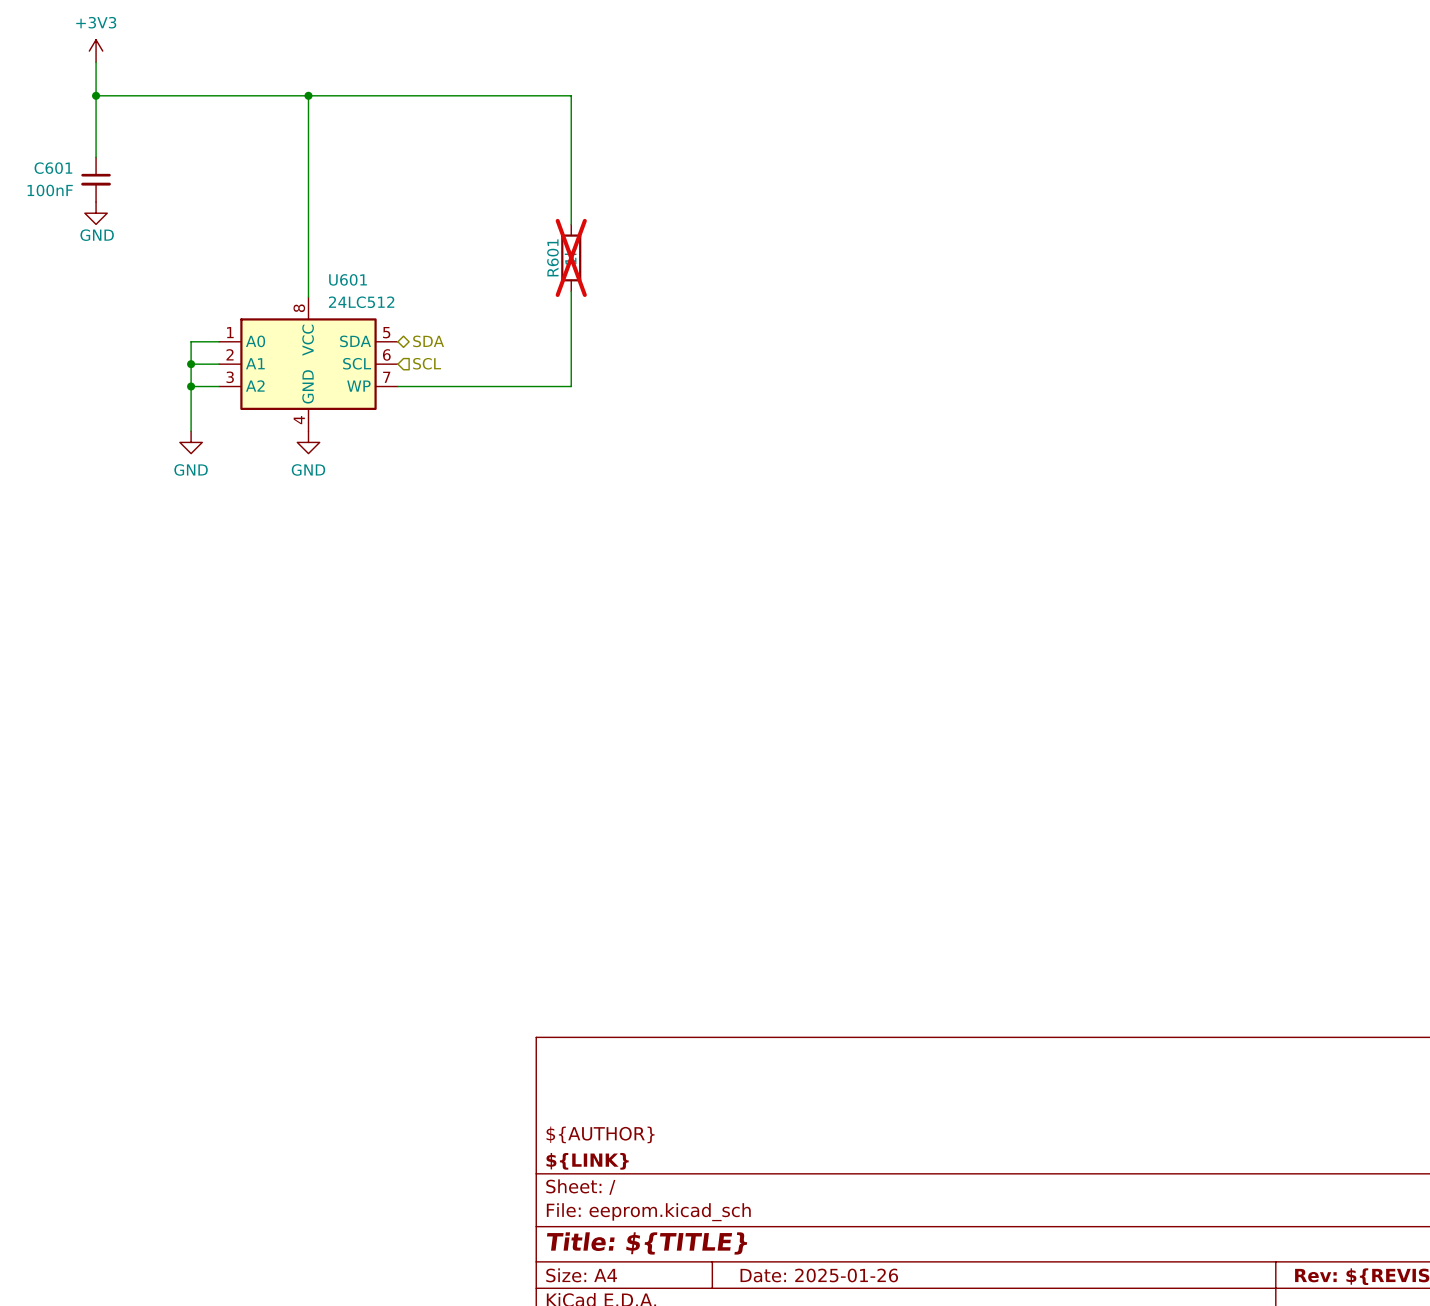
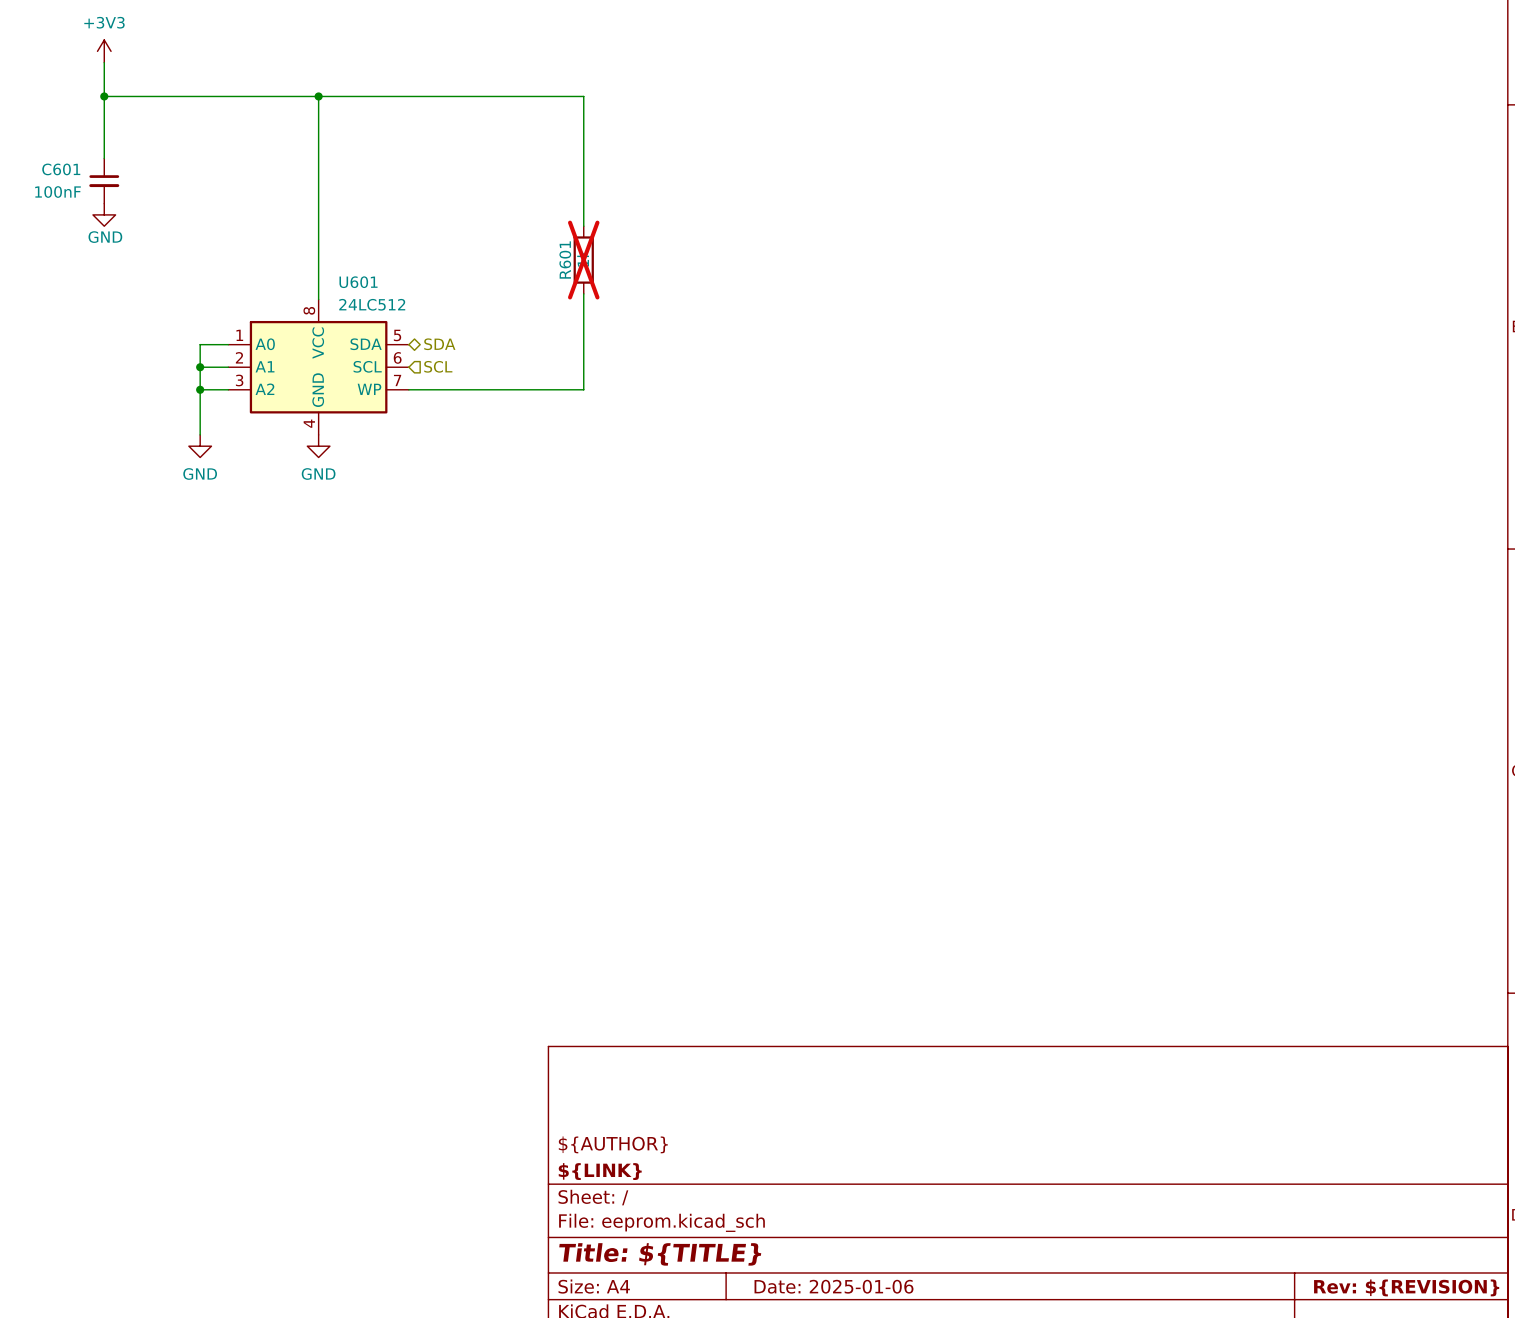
title block: Date: 2025-01-26 (819, 1275) -> Date: 2025-01-06 (834, 1286)

